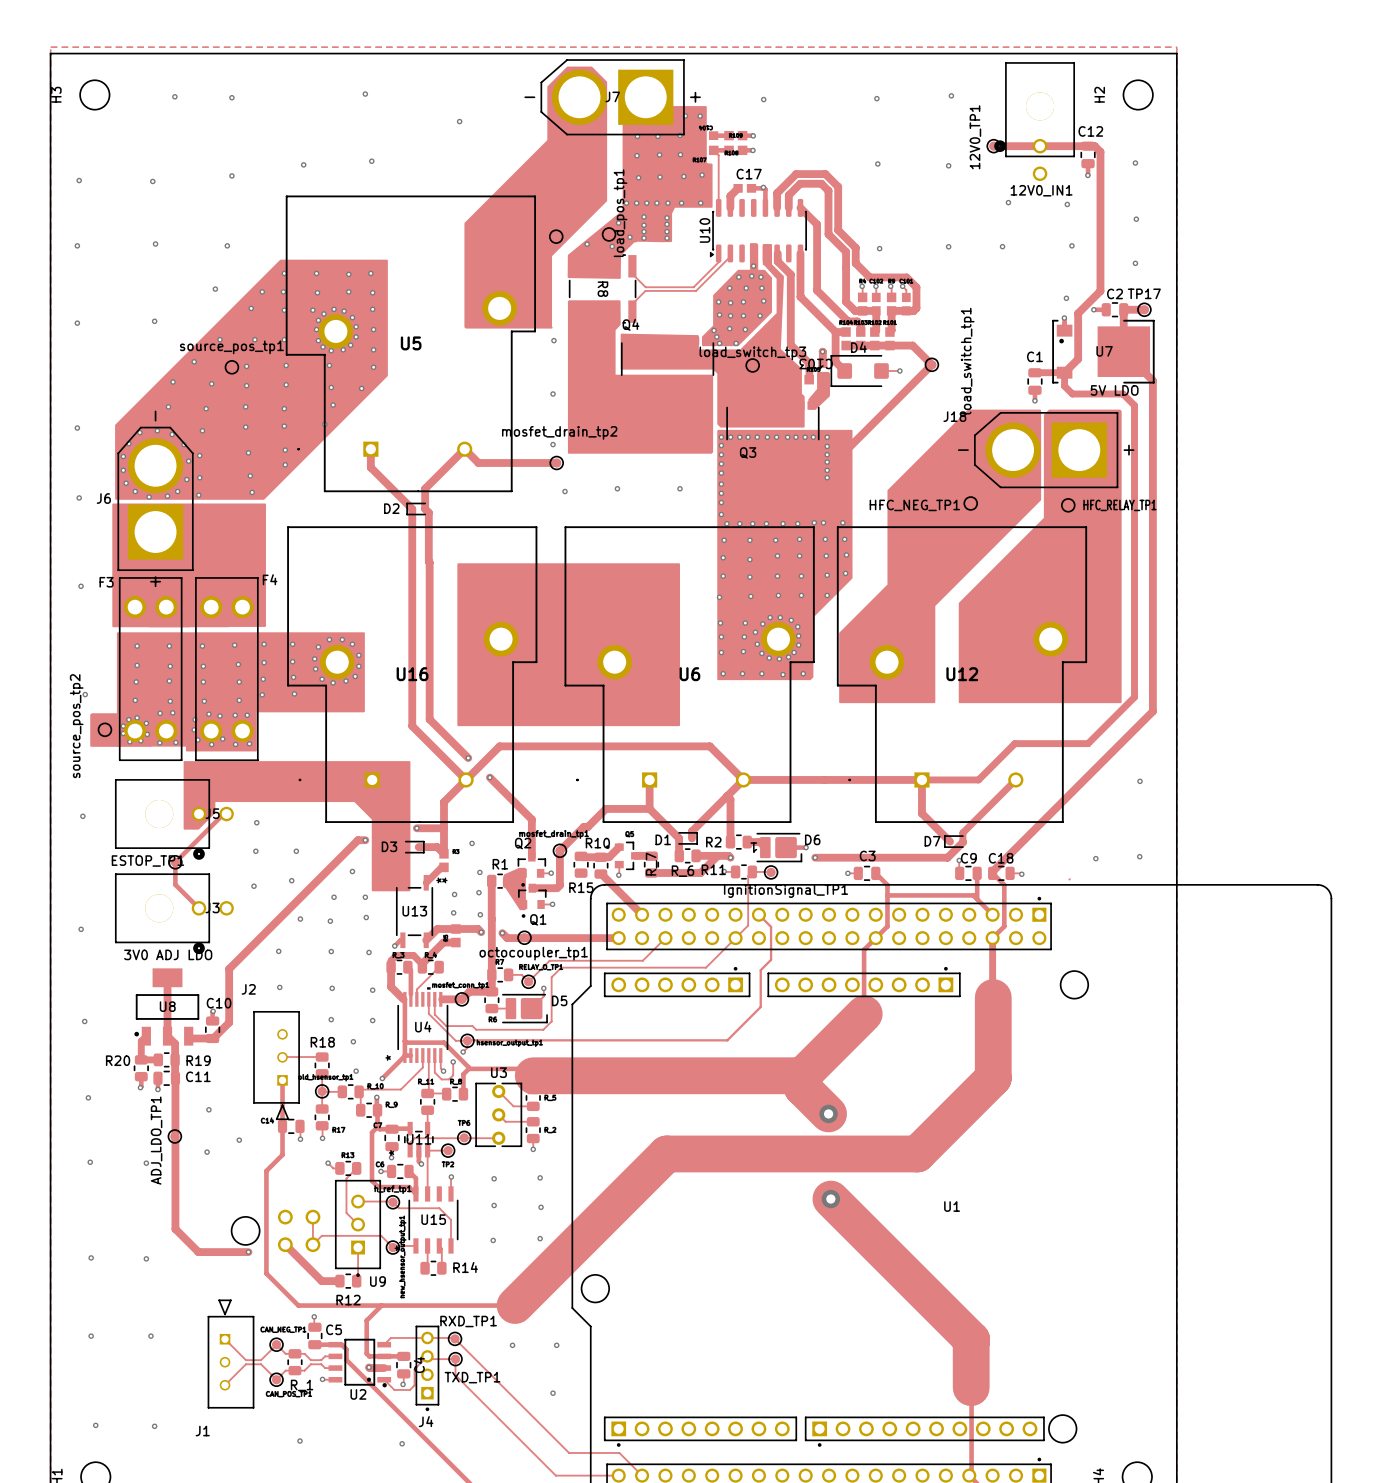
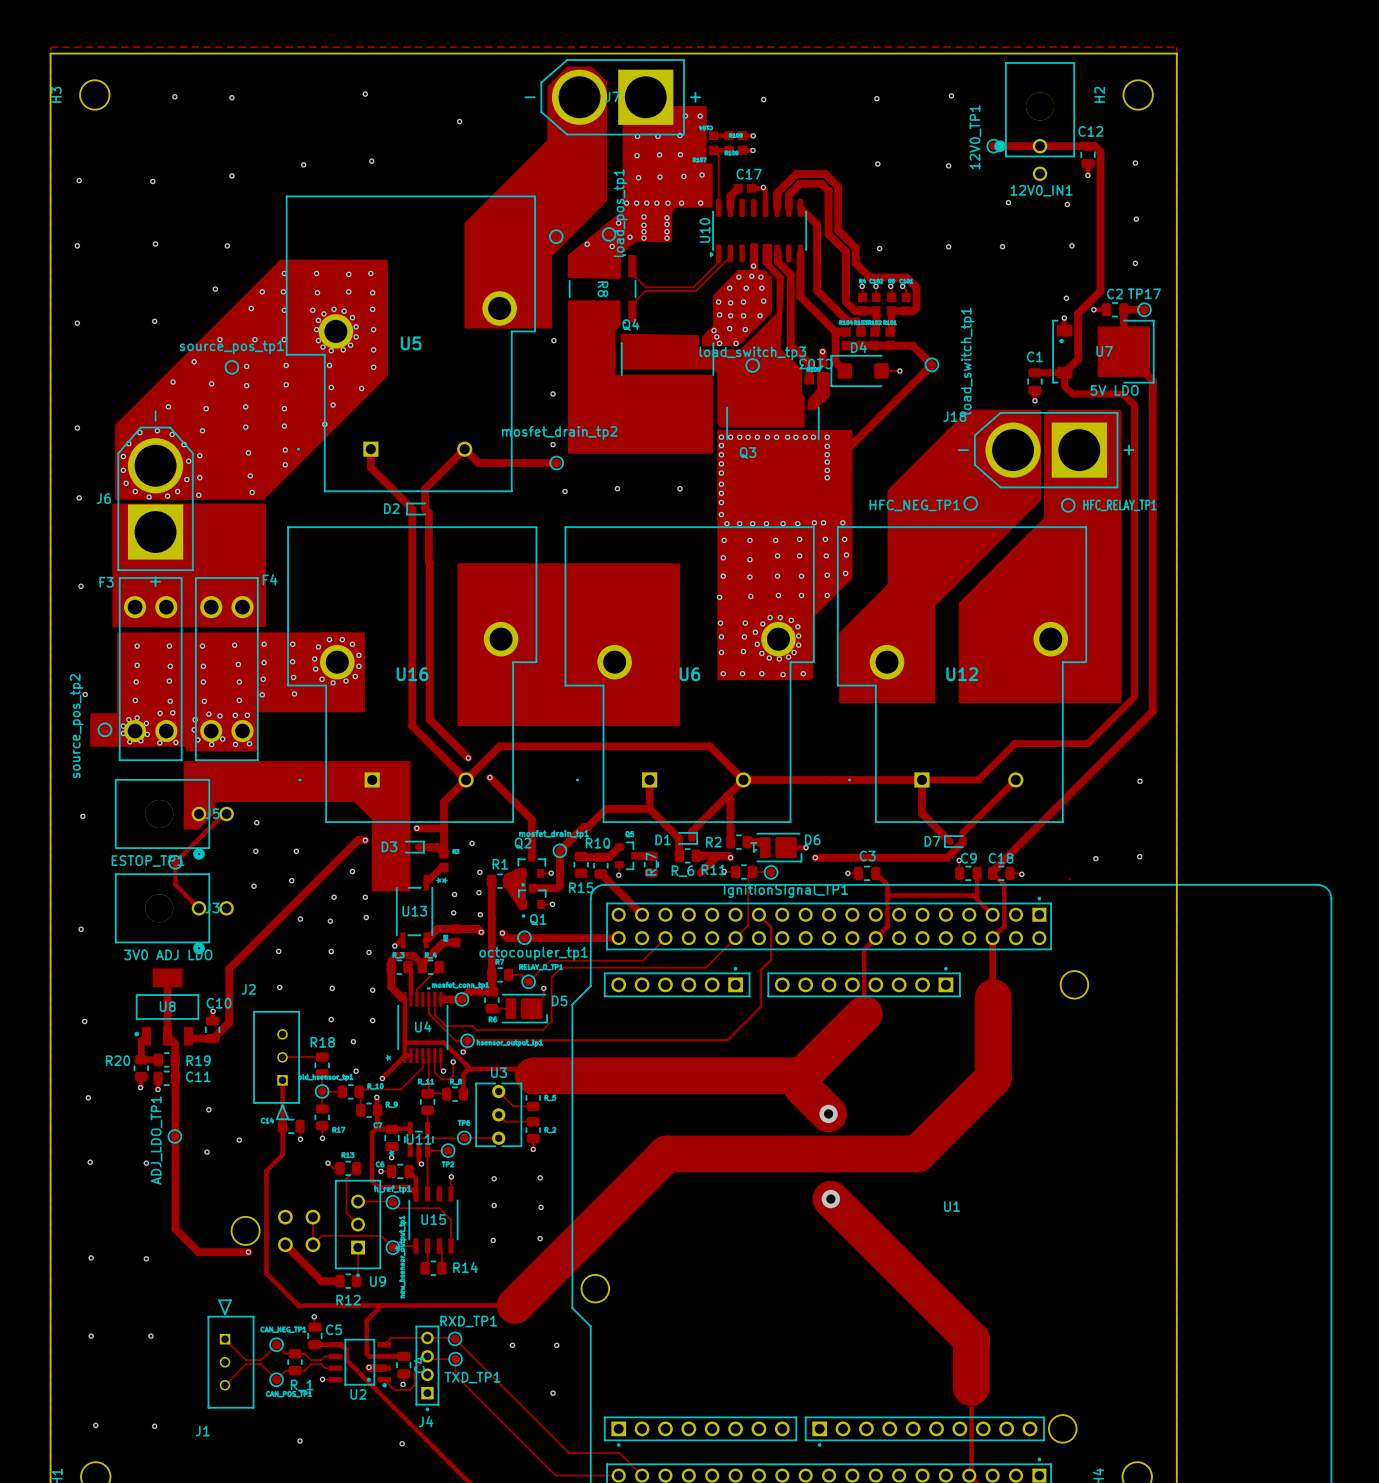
track: (651, 873) (700, 873) -> none

